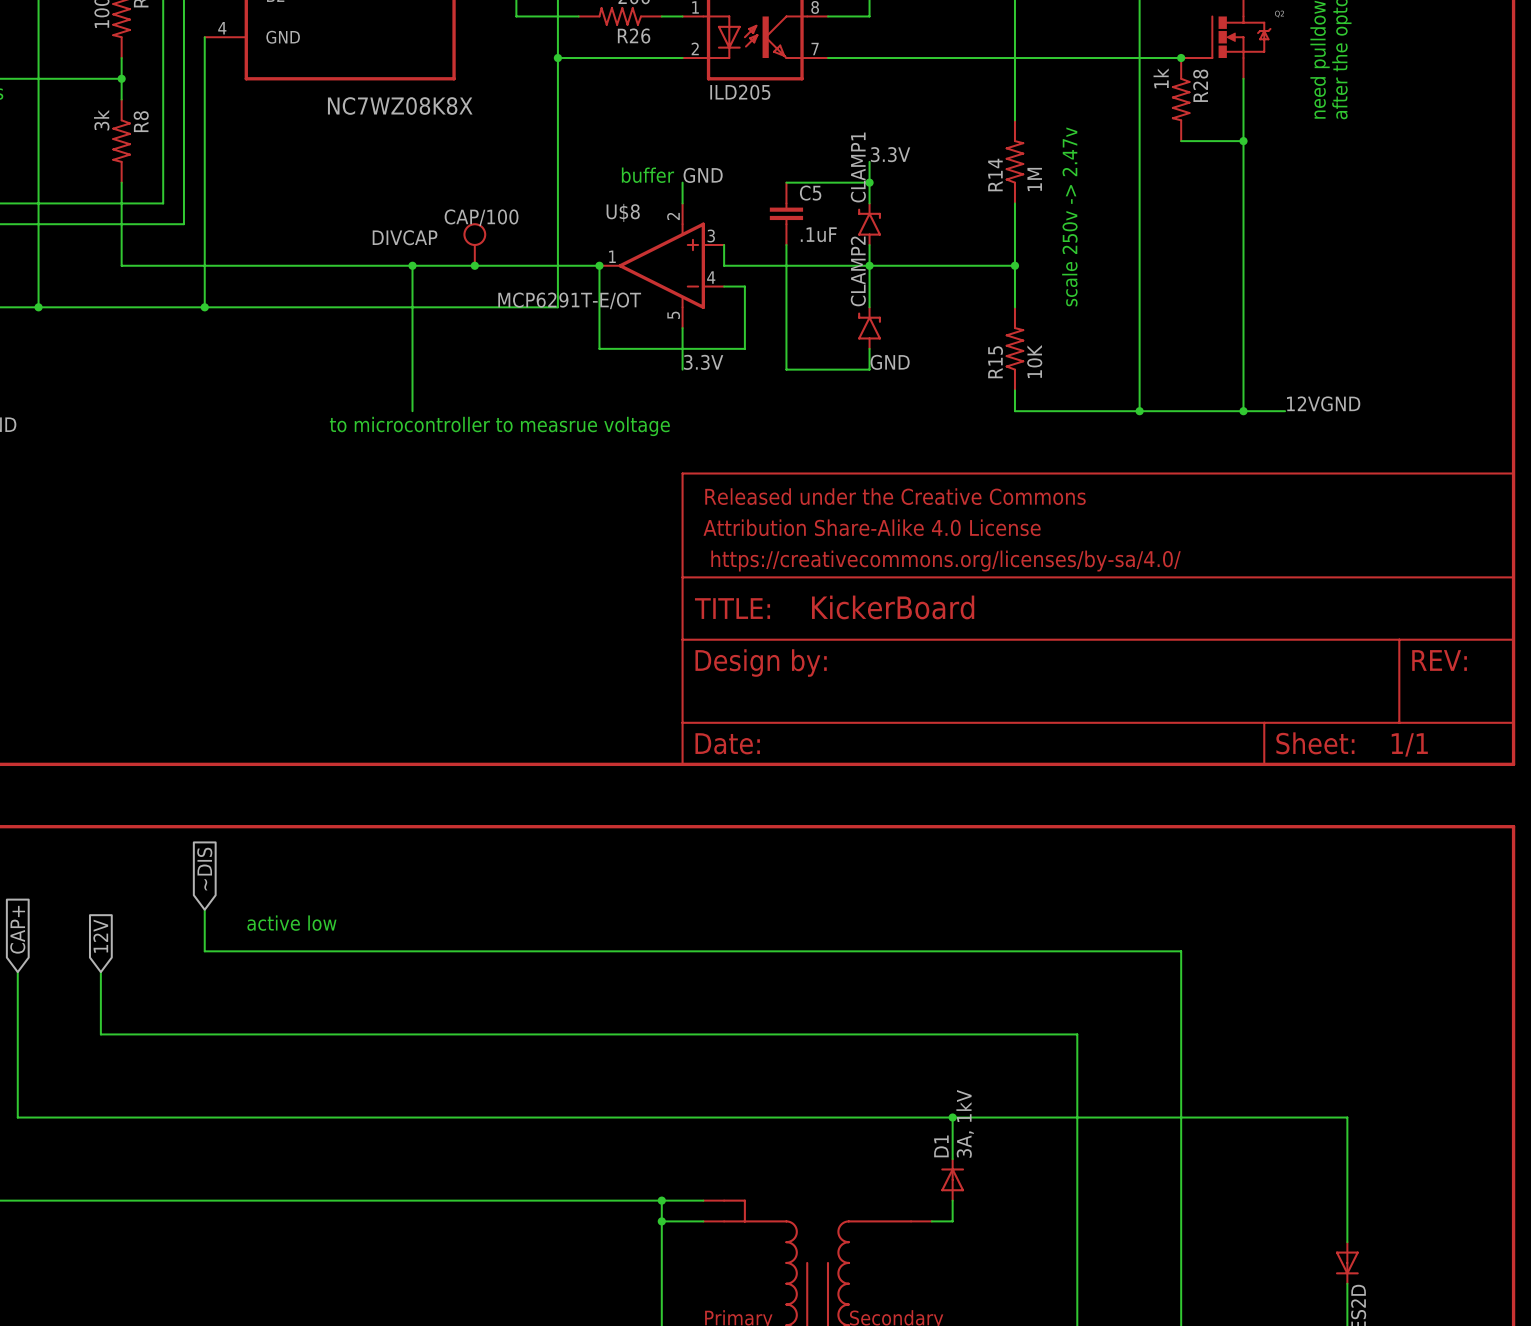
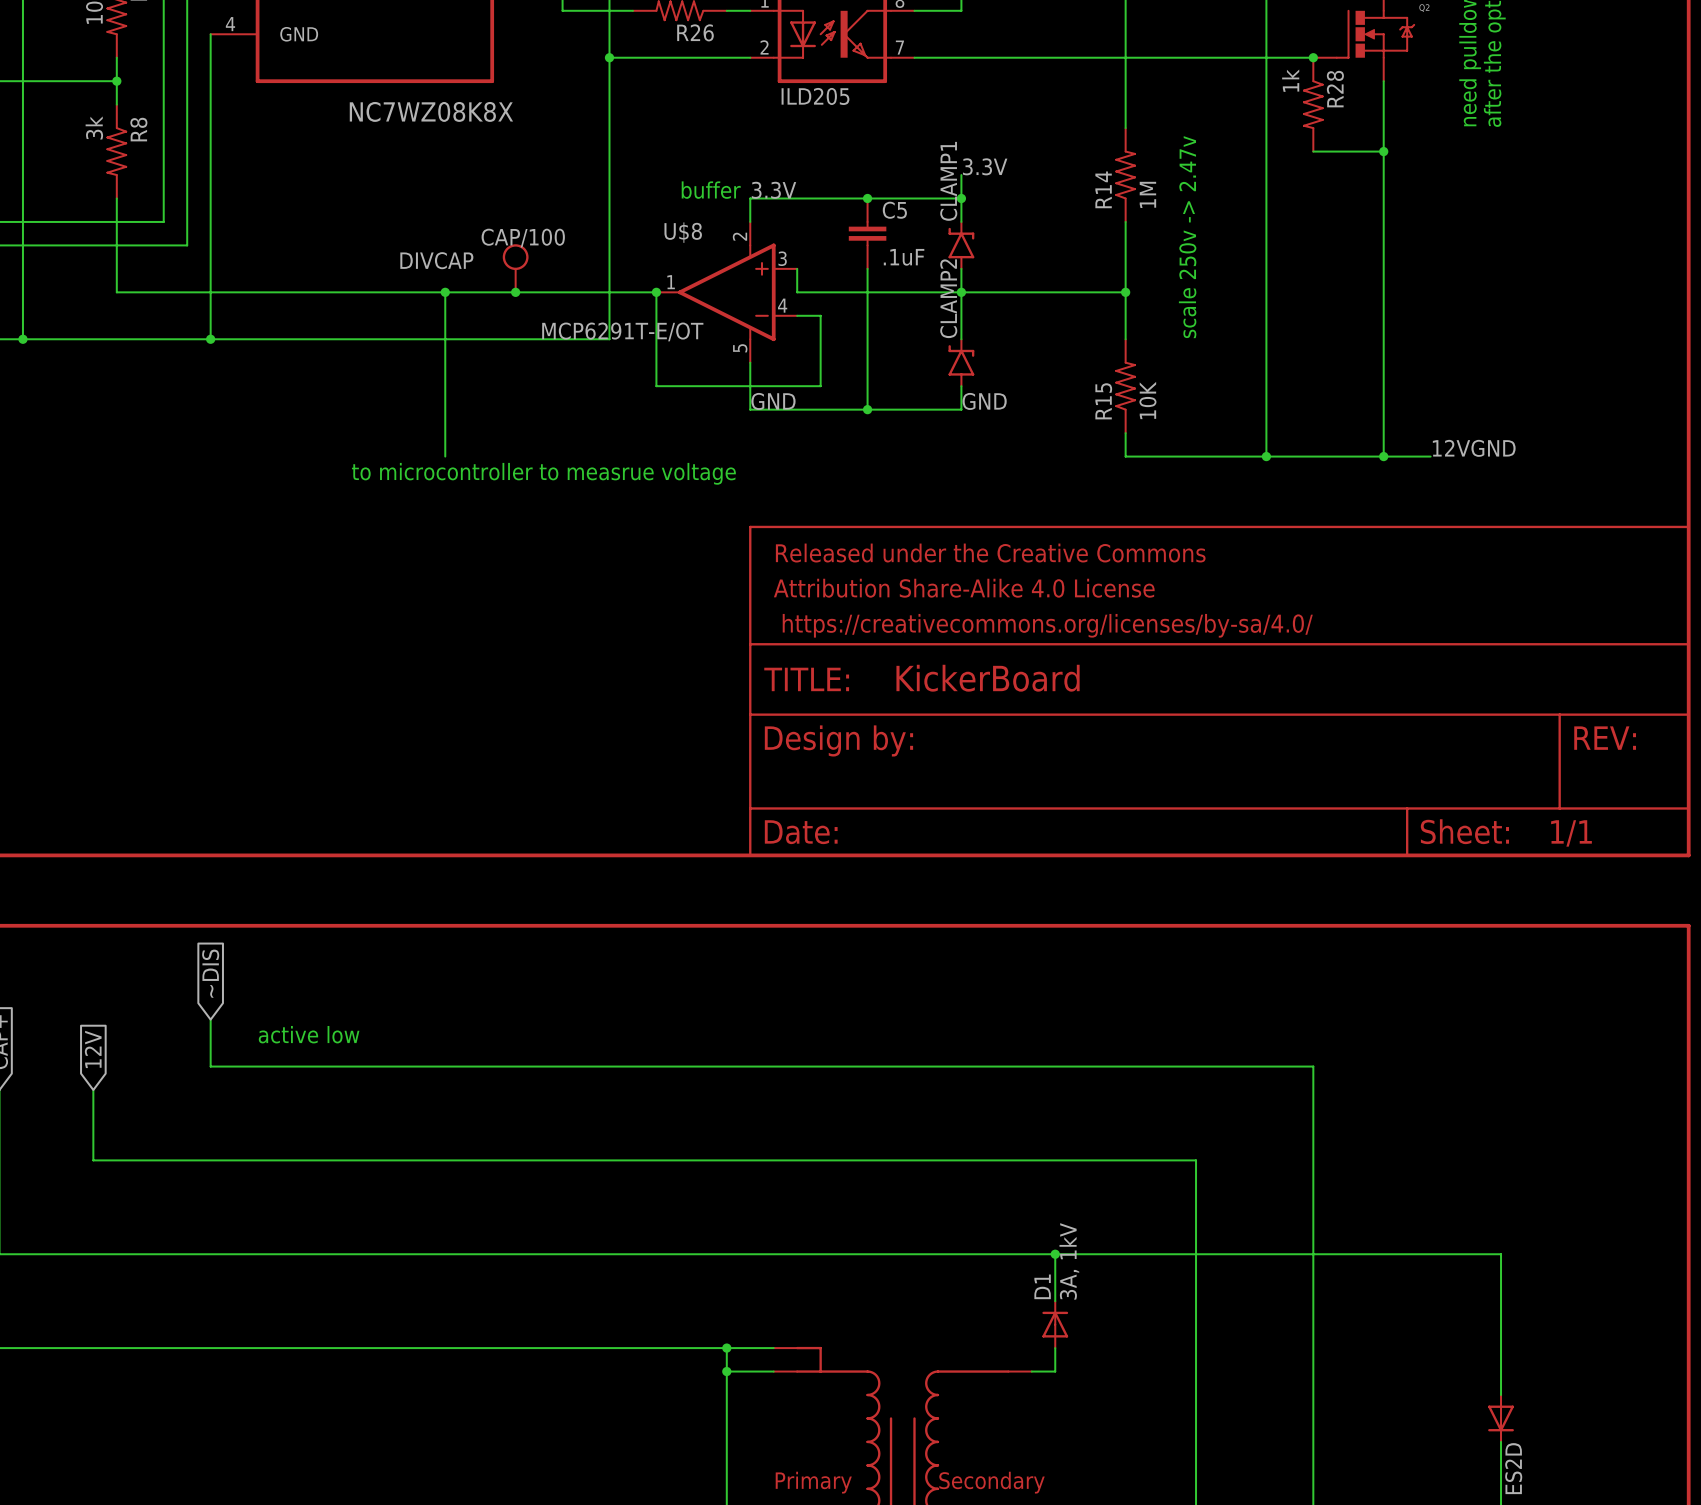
label: GND (703, 175) -> 3.3V (774, 190)
wire: none -> (750, 198) (867, 198)
junction: none -> (867, 198)
label: 3.3V (703, 362) -> GND (773, 401)
wire: none -> (750, 409) (867, 409)
junction: none -> (867, 409)

